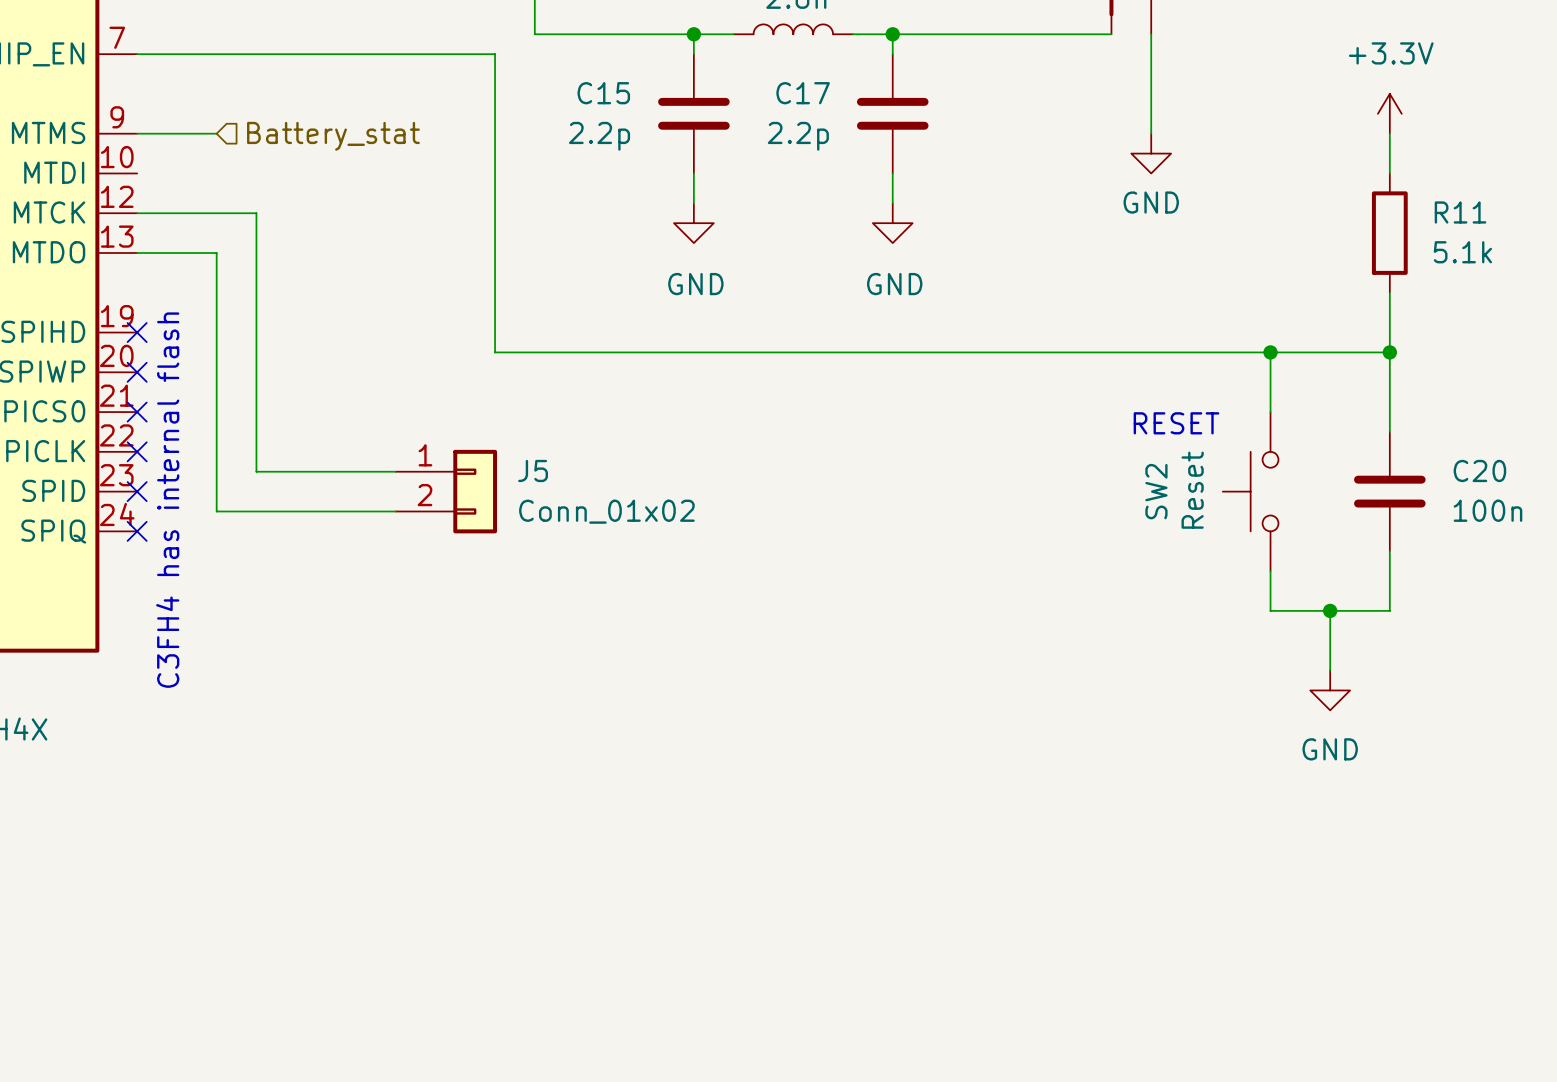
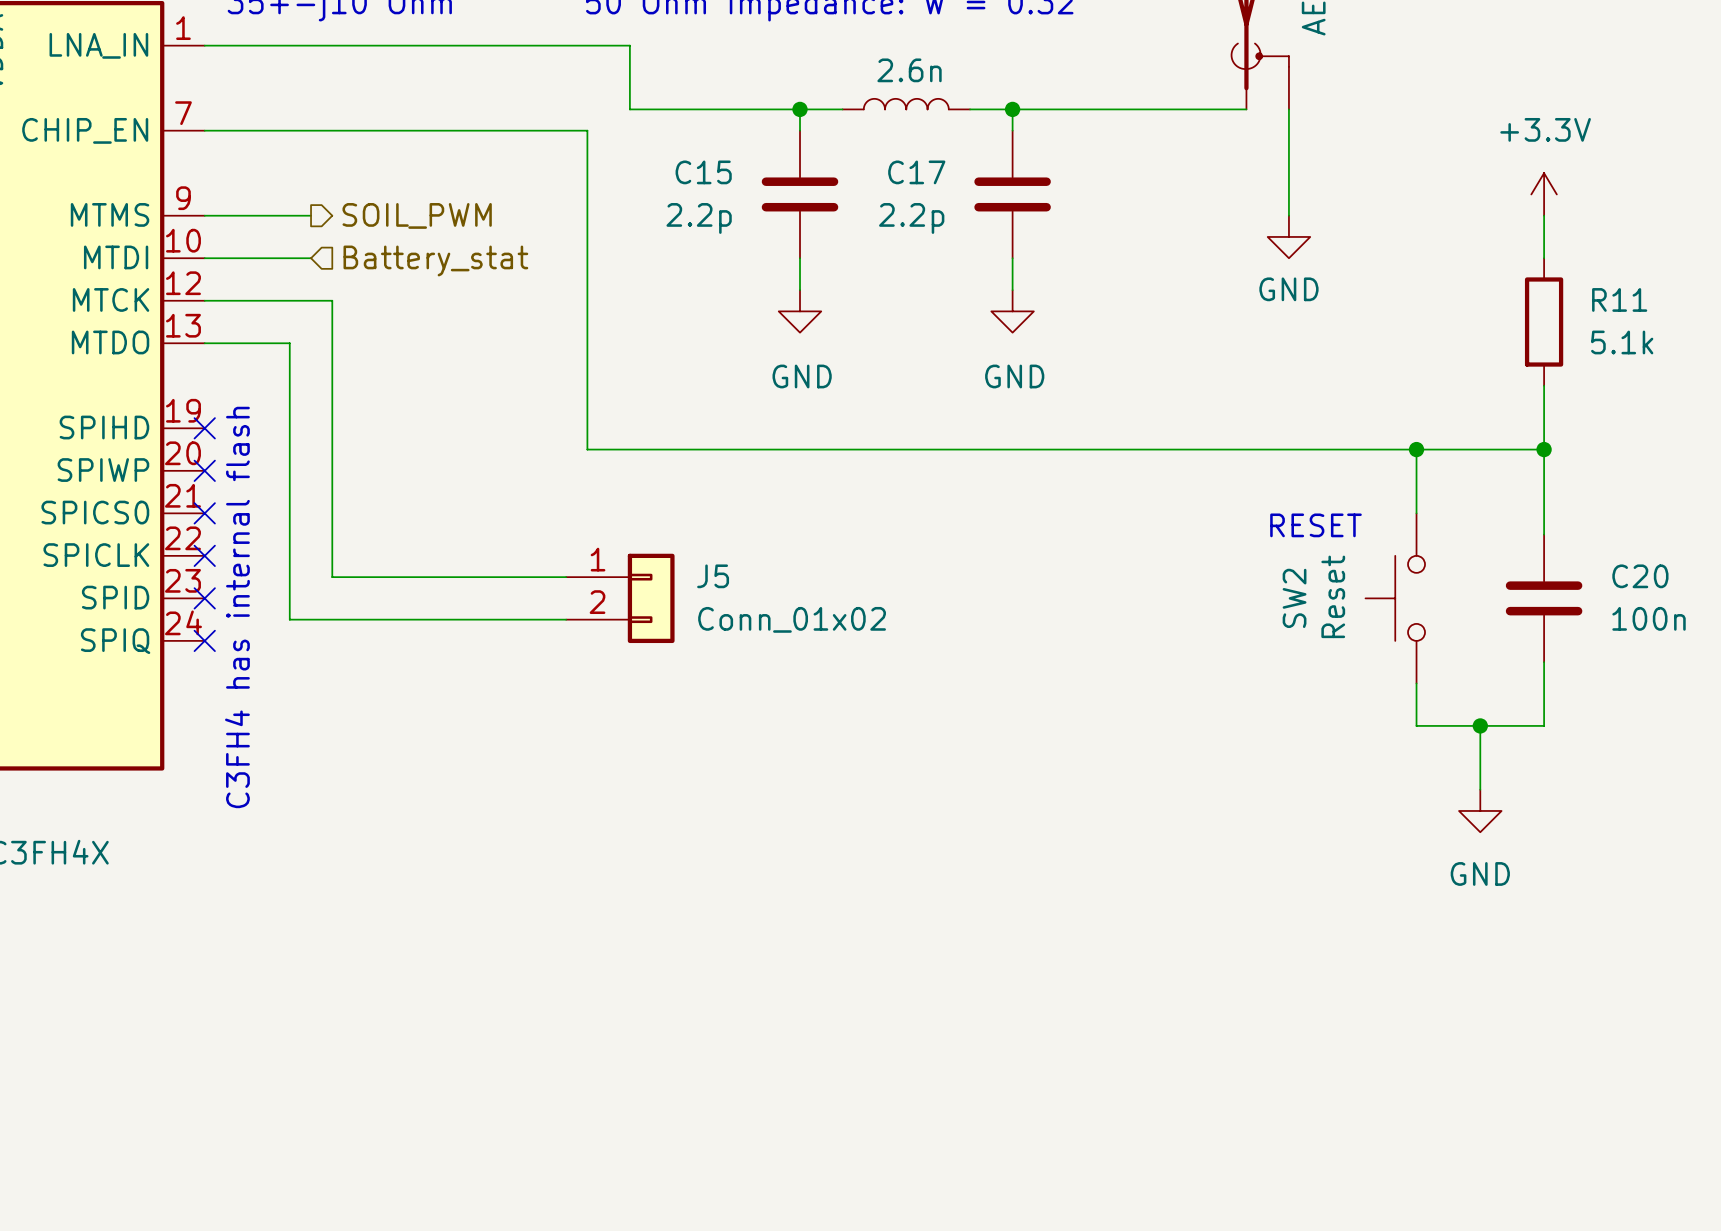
wire: none -> (289, 215) (311, 215)
hierarchical label: none -> SOIL_PWM (417, 215)
hierarchical label position: Battery_stat (333, 136) -> Battery_stat (435, 260)
wire: none -> (204, 258) (311, 258)
J5 position: (446, 491) -> (620, 598)

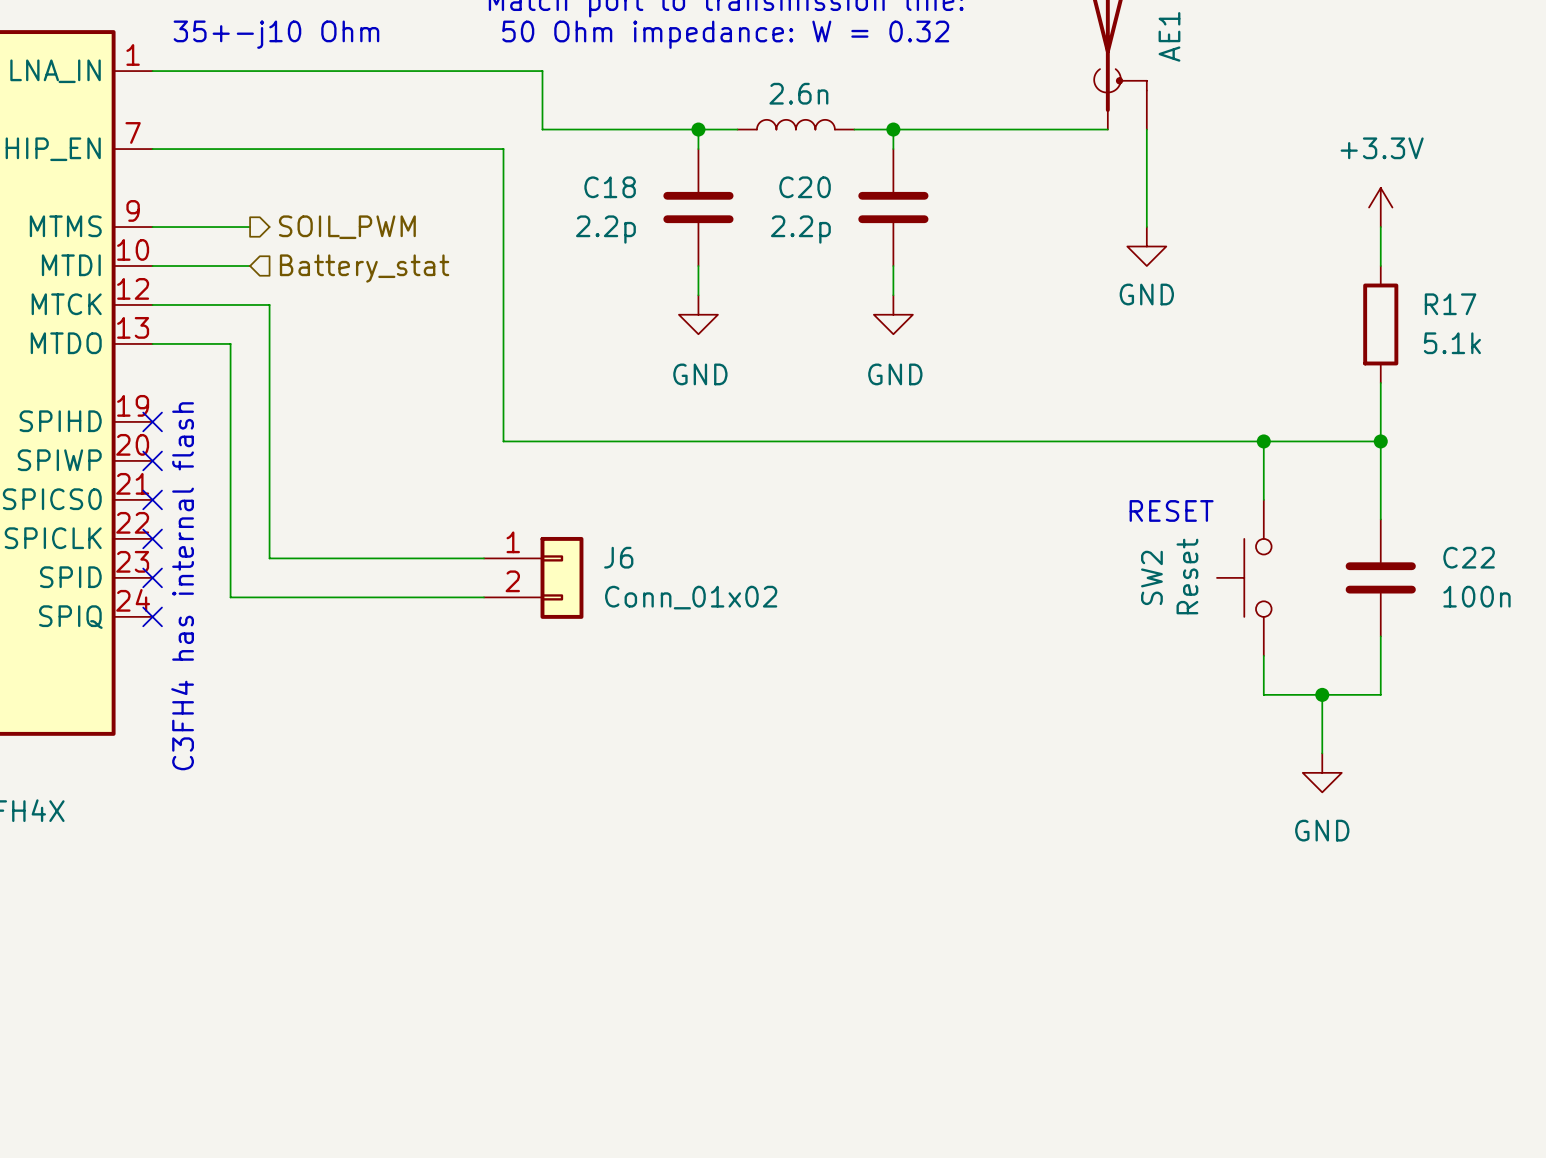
C15 name: C15 (703, 172) -> C18 (610, 187)
C17 name: C17 (916, 172) -> C20 (805, 187)
R11 name: R11 (1619, 299) -> R17 (1450, 304)
J5 name: J5 (713, 576) -> J6 (618, 557)
C20 name: C20 (1640, 576) -> C22 (1469, 557)

